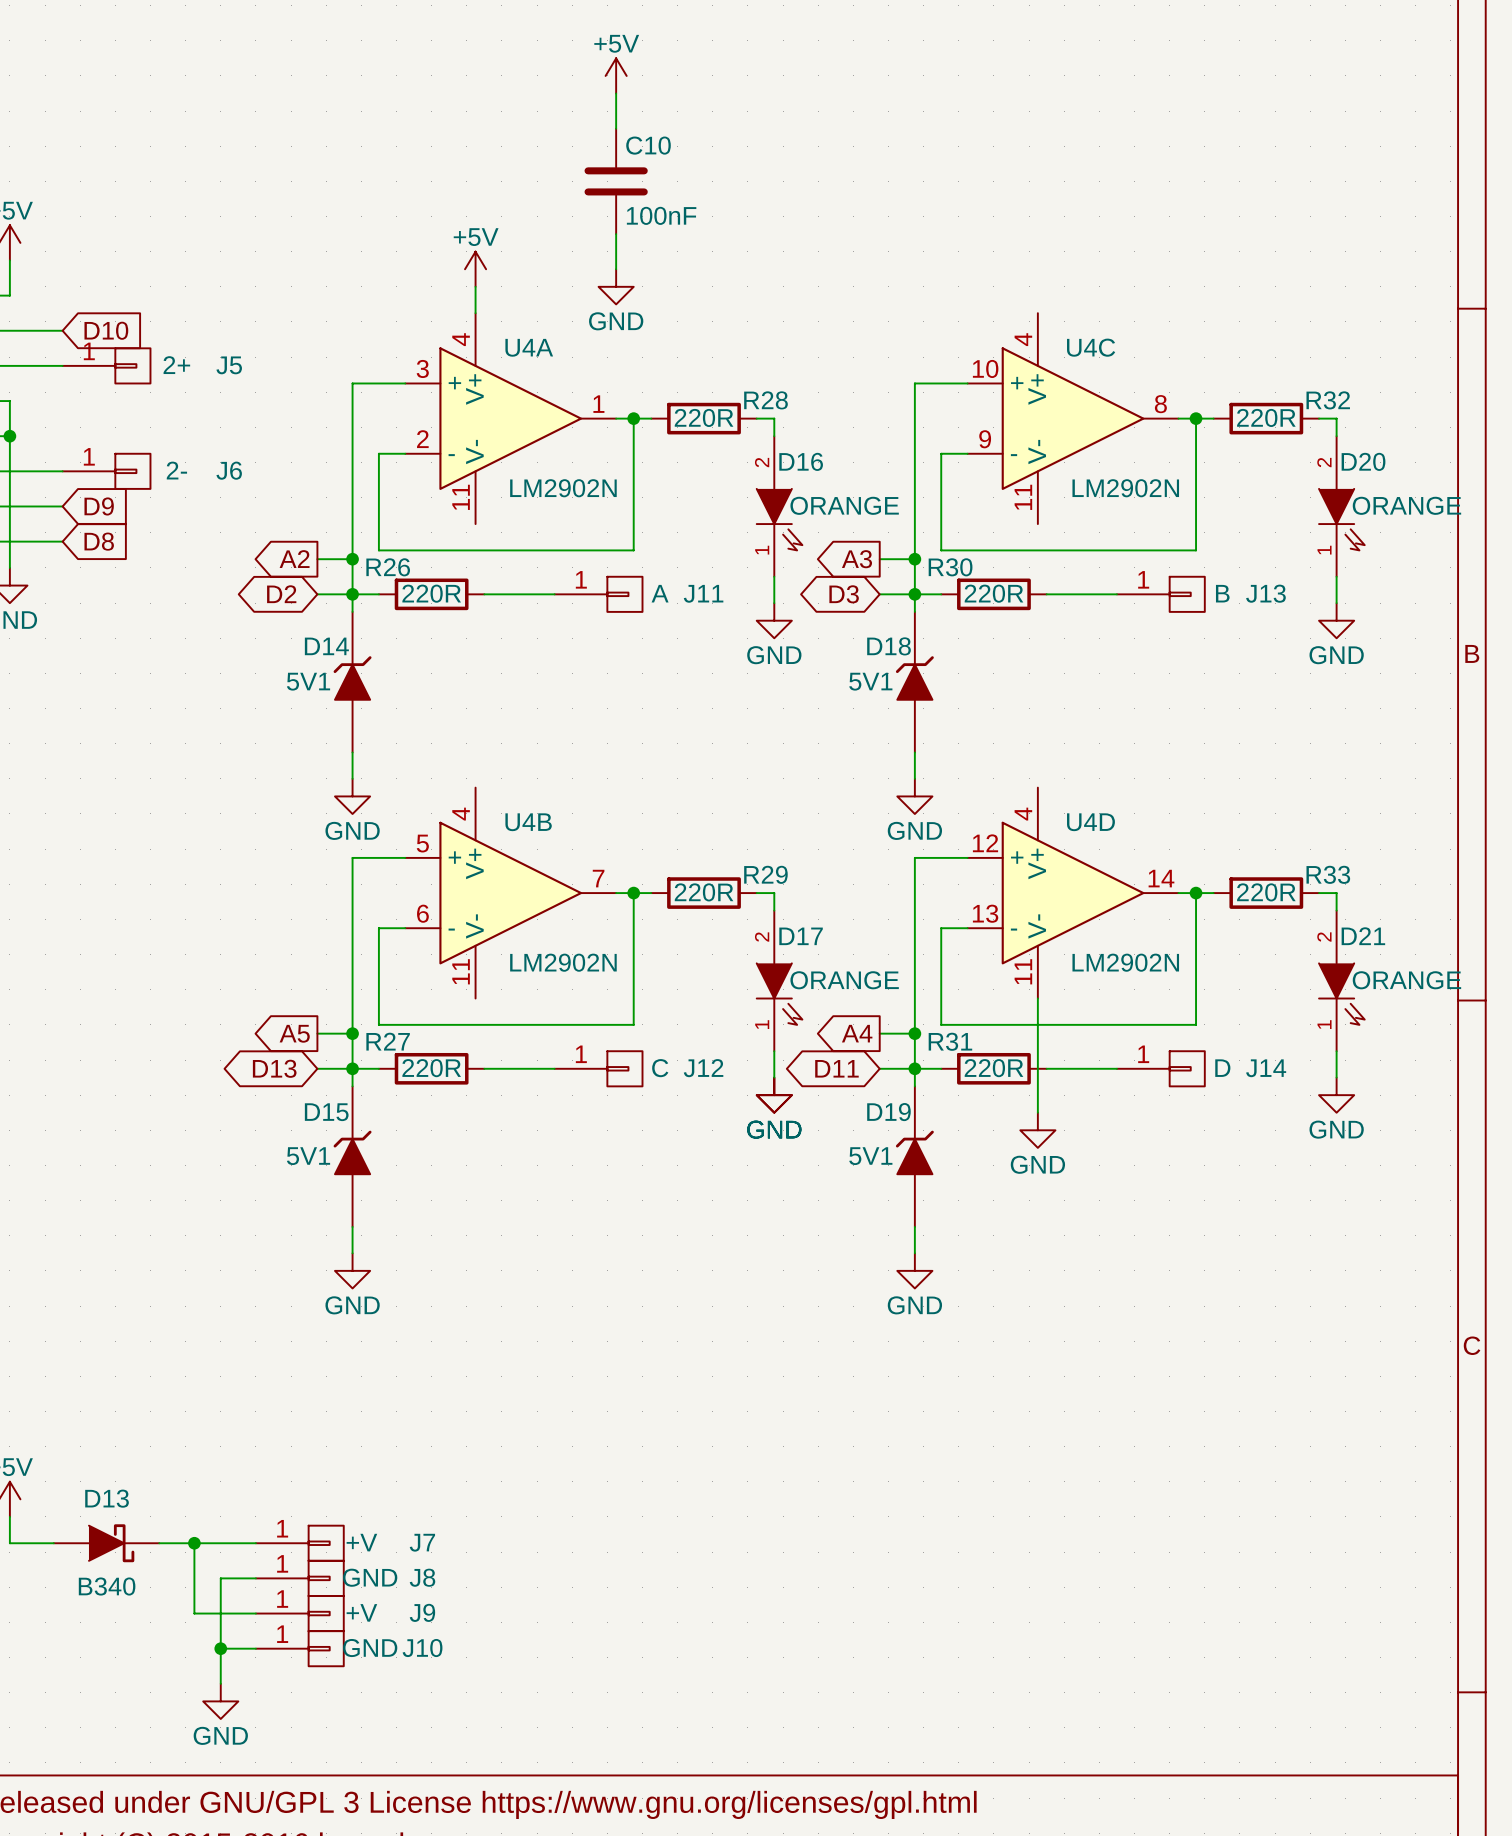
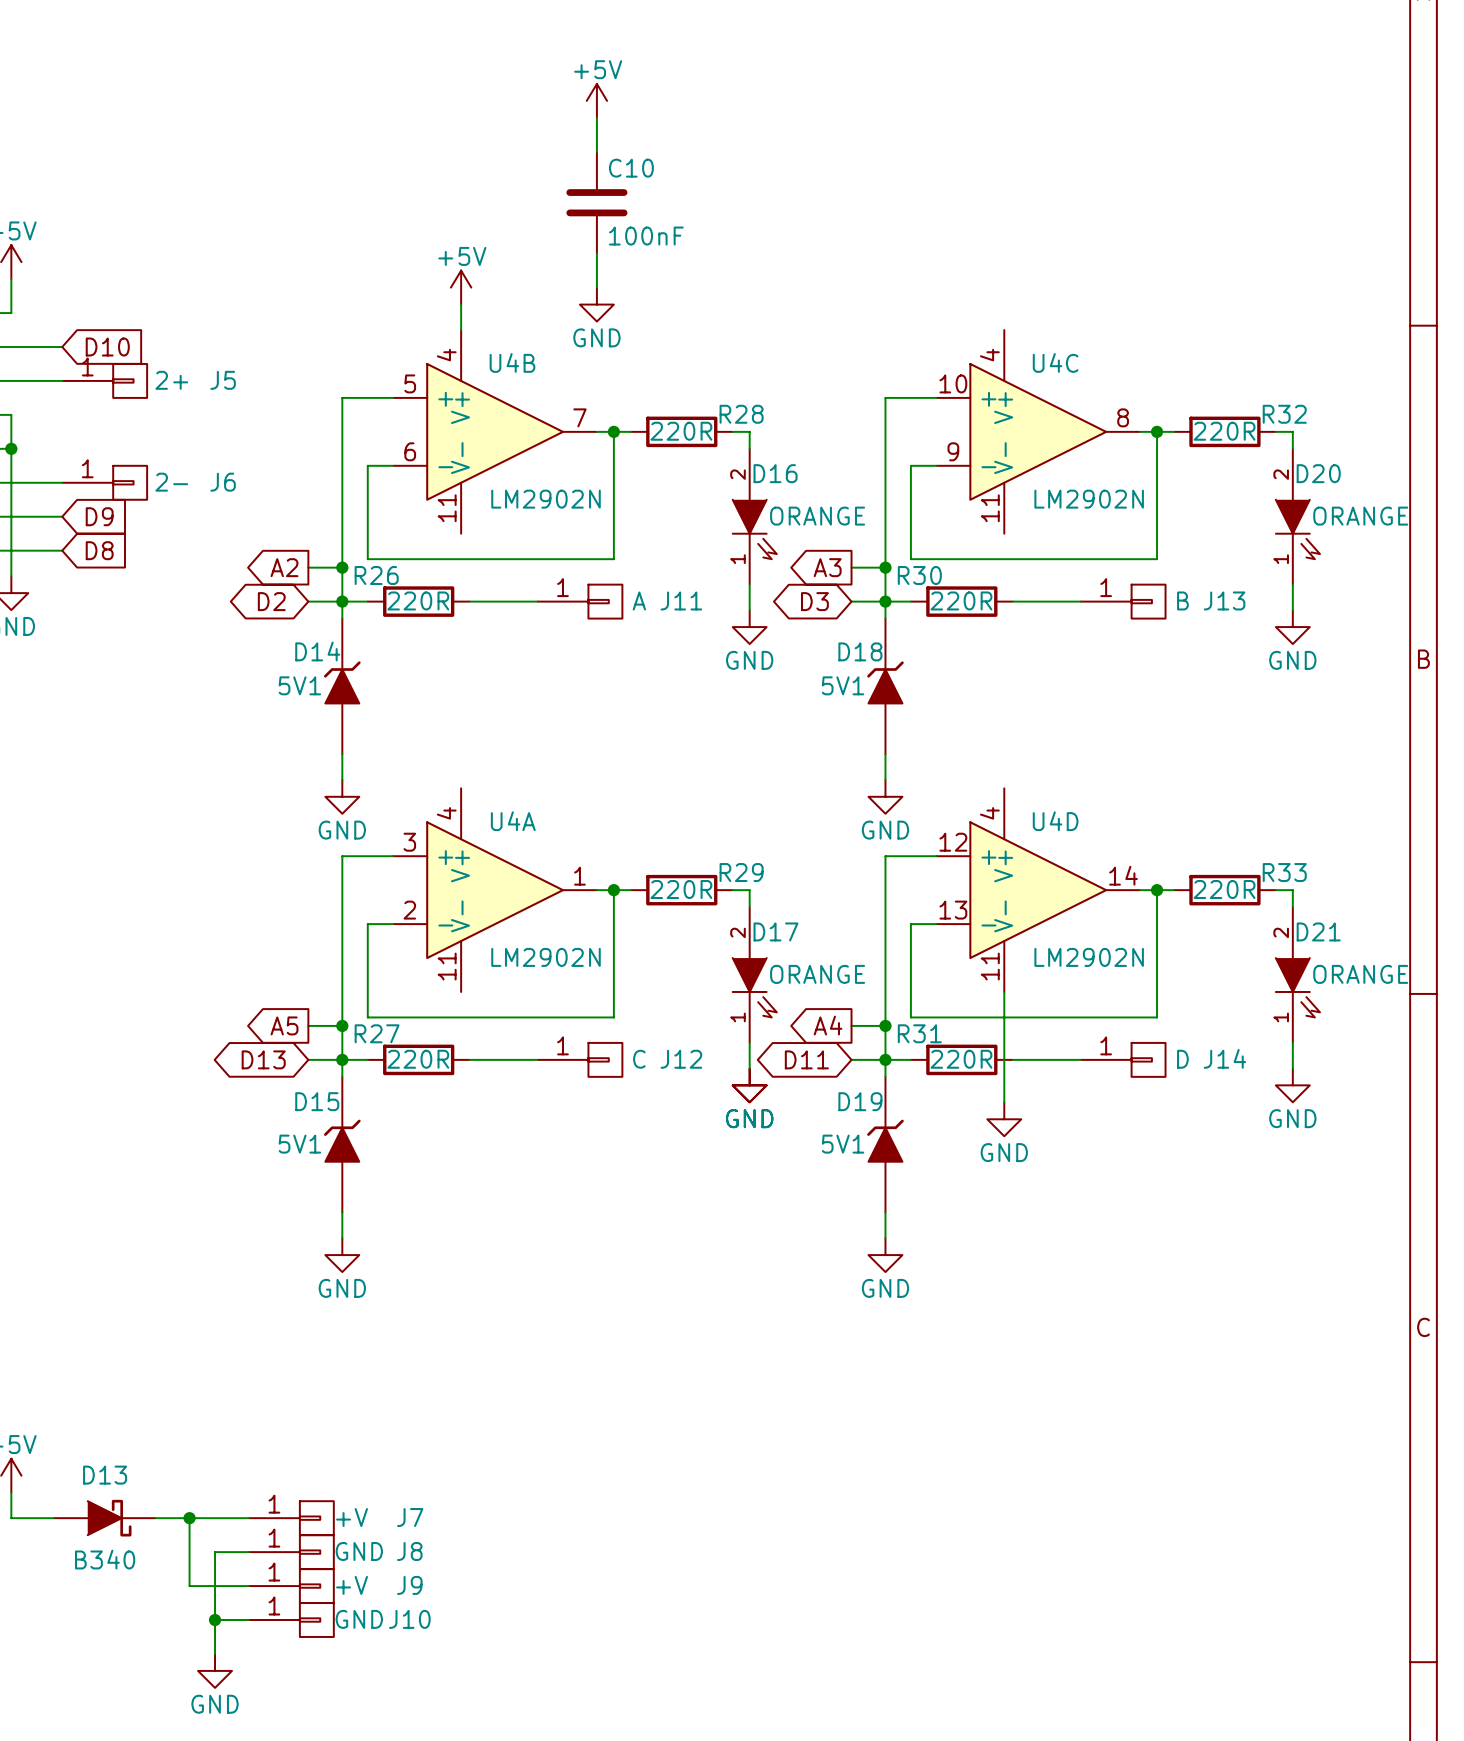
U4A position: (510, 418) -> (495, 890)
U4B position: (510, 893) -> (495, 431)

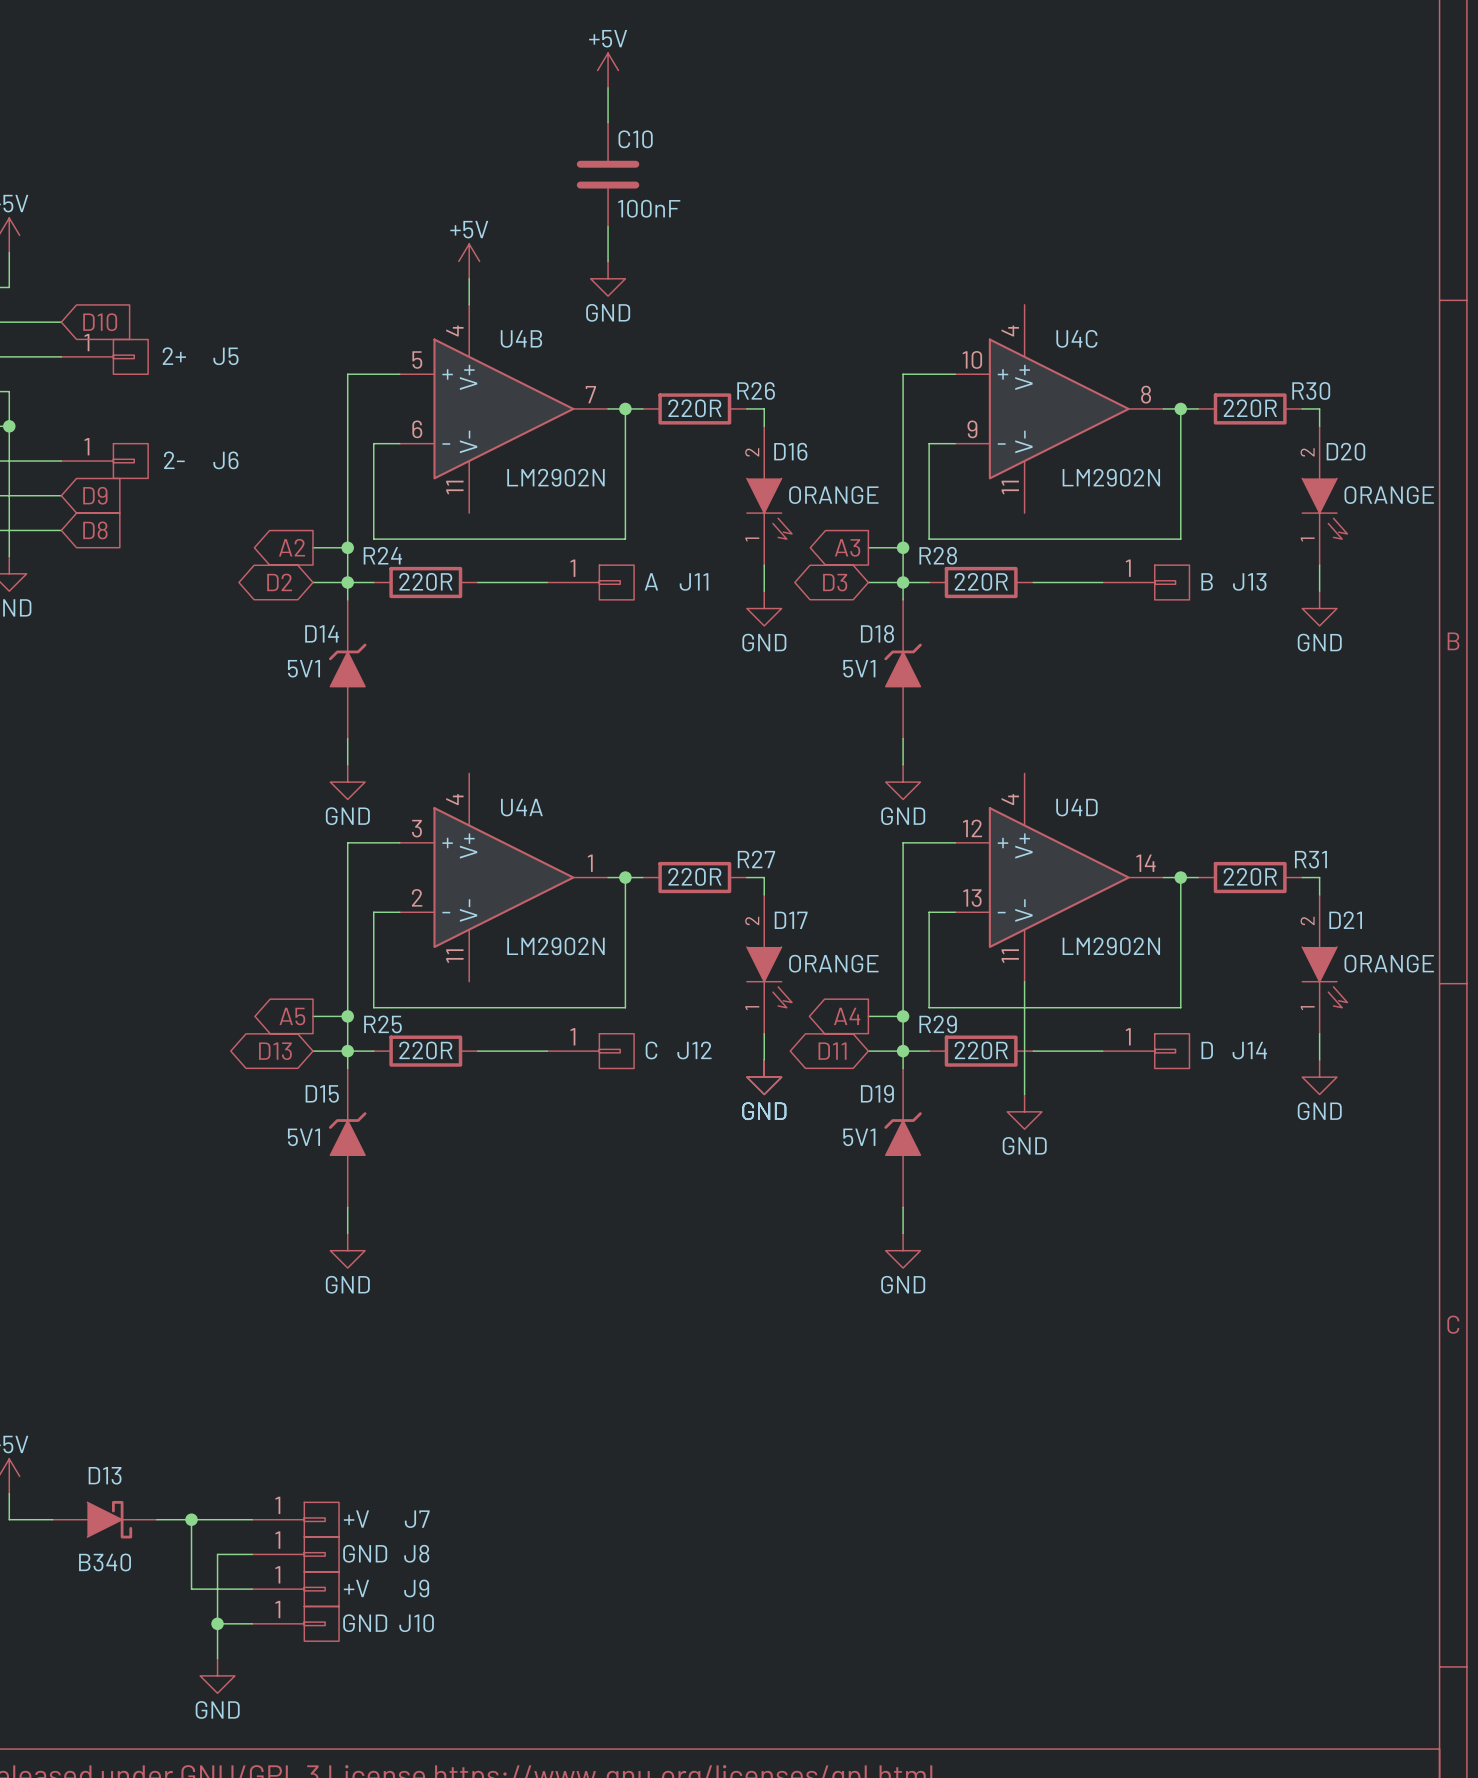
R28 name: R28 (741, 414) -> R26 (756, 390)
R32 name: R32 (1284, 414) -> R30 (1311, 390)
R26 name: R26 (376, 575) -> R24 (382, 555)
R30 name: R30 (919, 575) -> R28 (938, 555)
R29 name: R29 (741, 872) -> R27 (756, 859)
R33 name: R33 (1284, 872) -> R31 (1310, 859)
R27 name: R27 (377, 1033) -> R25 (382, 1024)
R31 name: R31 (919, 1033) -> R29 (938, 1024)

